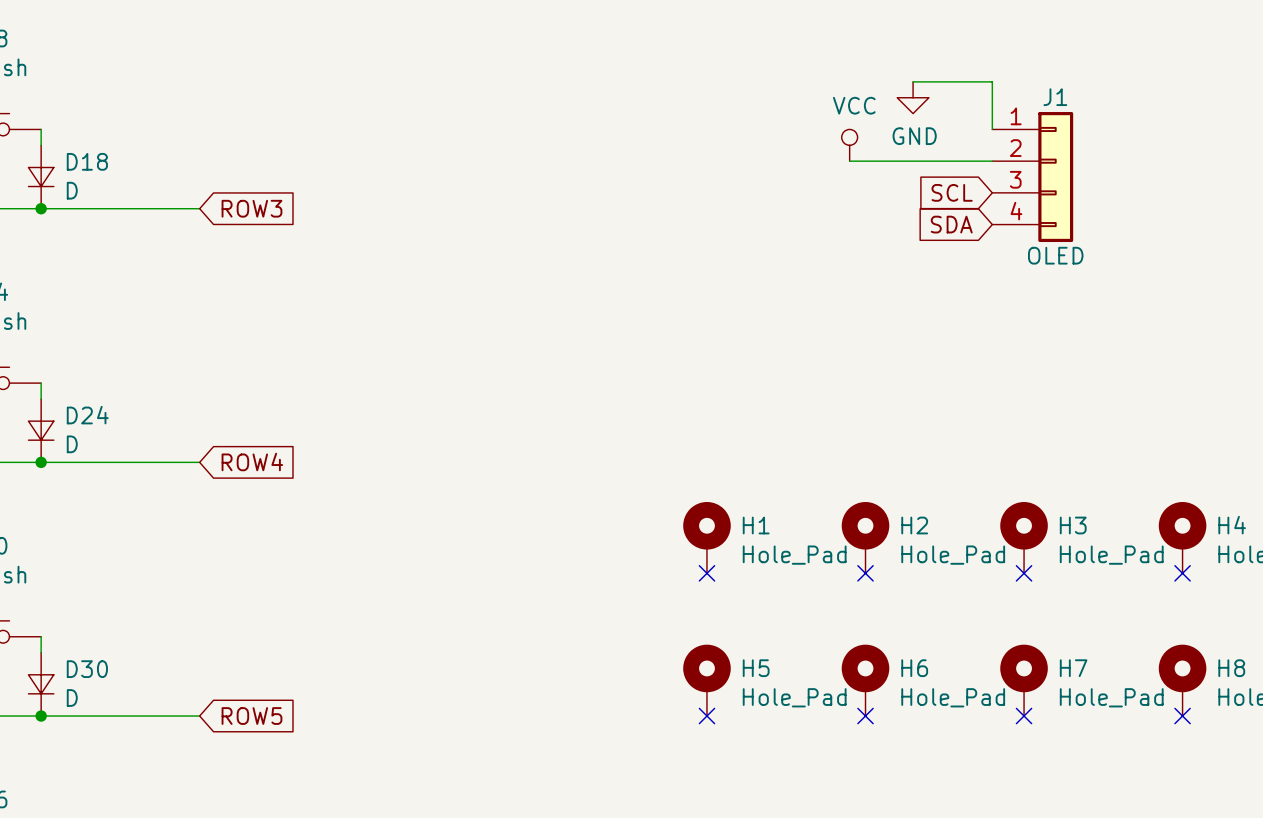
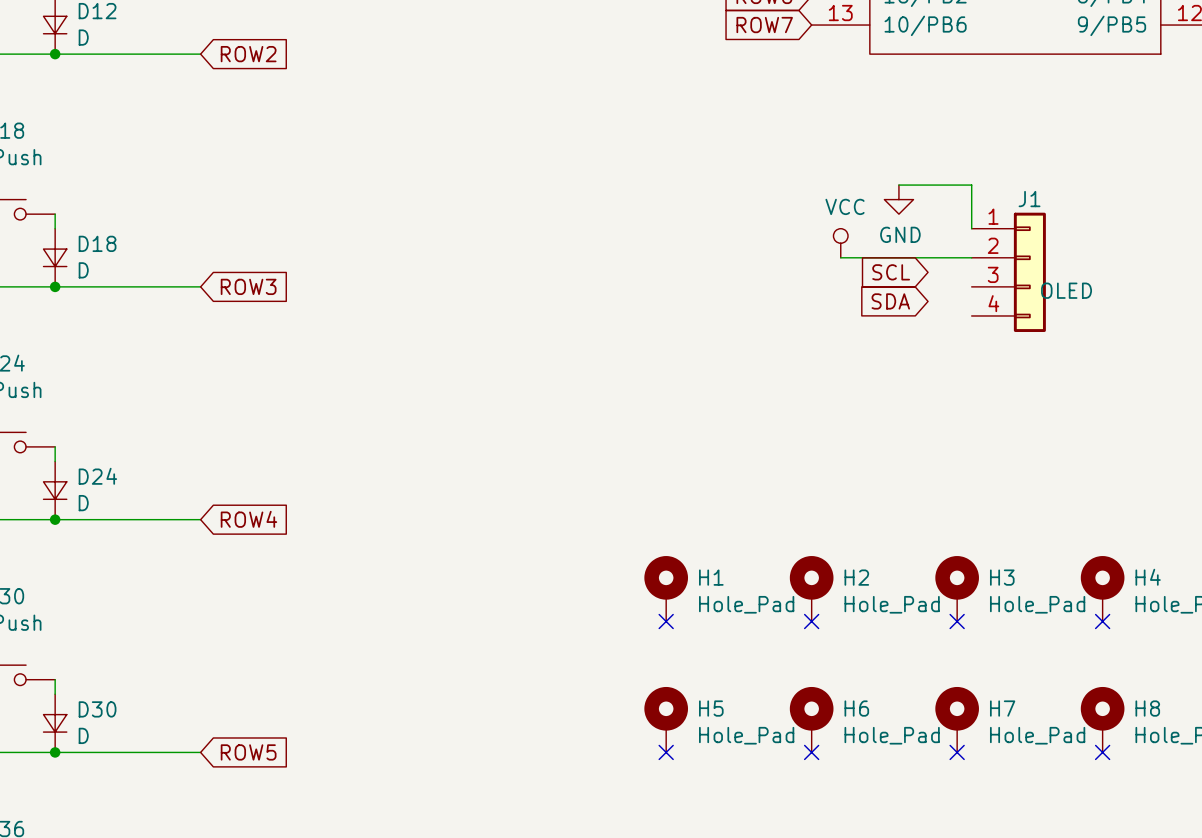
wire: (913, 81) (992, 81) (992, 129) -> (898, 185) (971, 185) (971, 228)
power symbol position: GND (913, 97) -> GND (898, 199)
power symbol position: VCC (849, 145) -> VCC (840, 243)
wire: (849, 161) (992, 161) -> (840, 257) (971, 257)
J1 position: (1032, 177) -> (1008, 272)
J1 value position: OLED (1055, 255) -> OLED (1066, 290)

